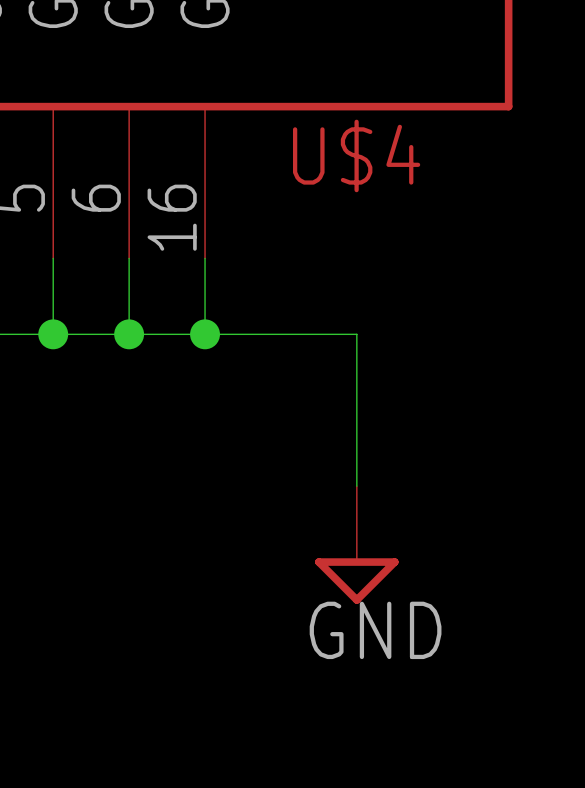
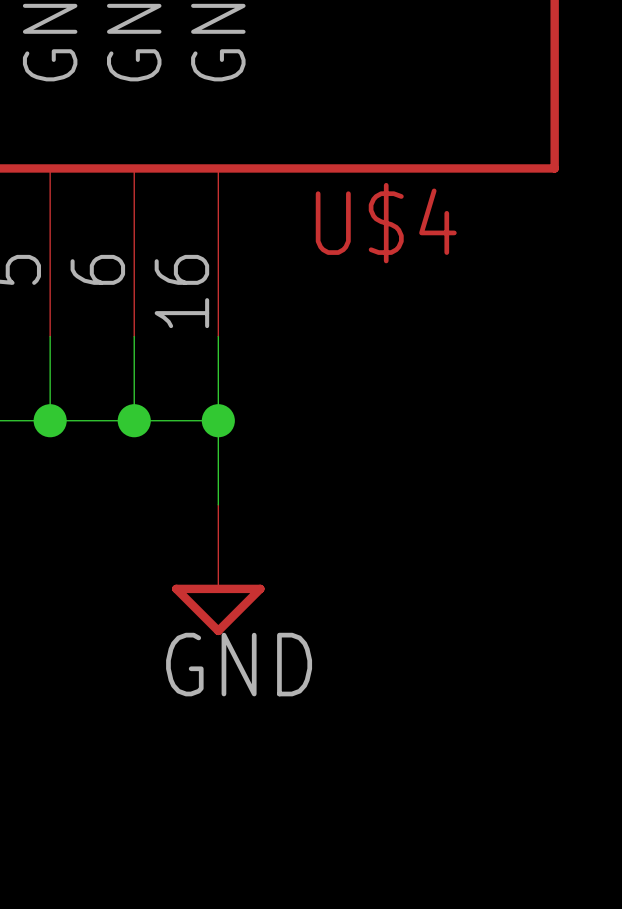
wire: (205, 334) (356, 334) (356, 486) -> (218, 420) (218, 504)
power symbol position: GND (356, 544) -> GND (218, 569)

